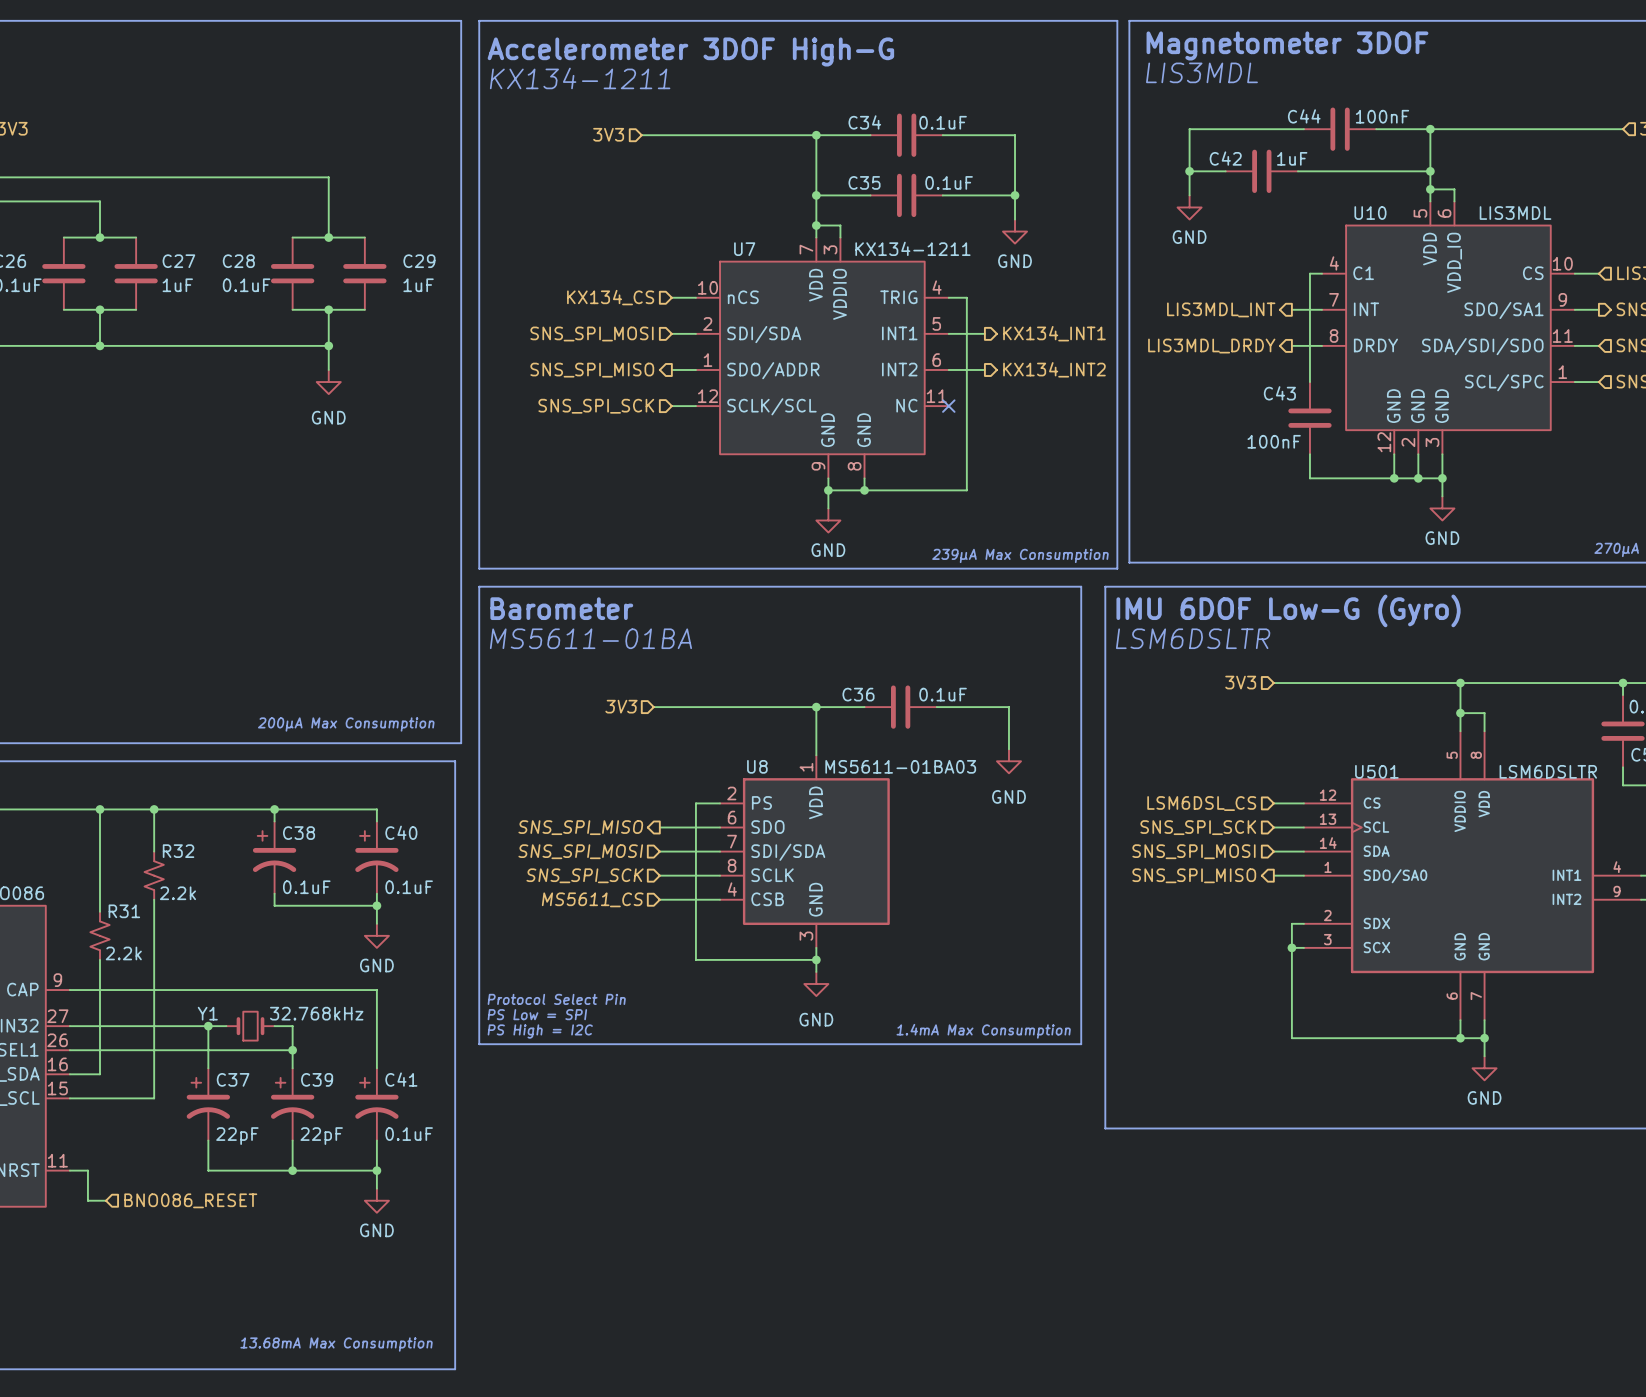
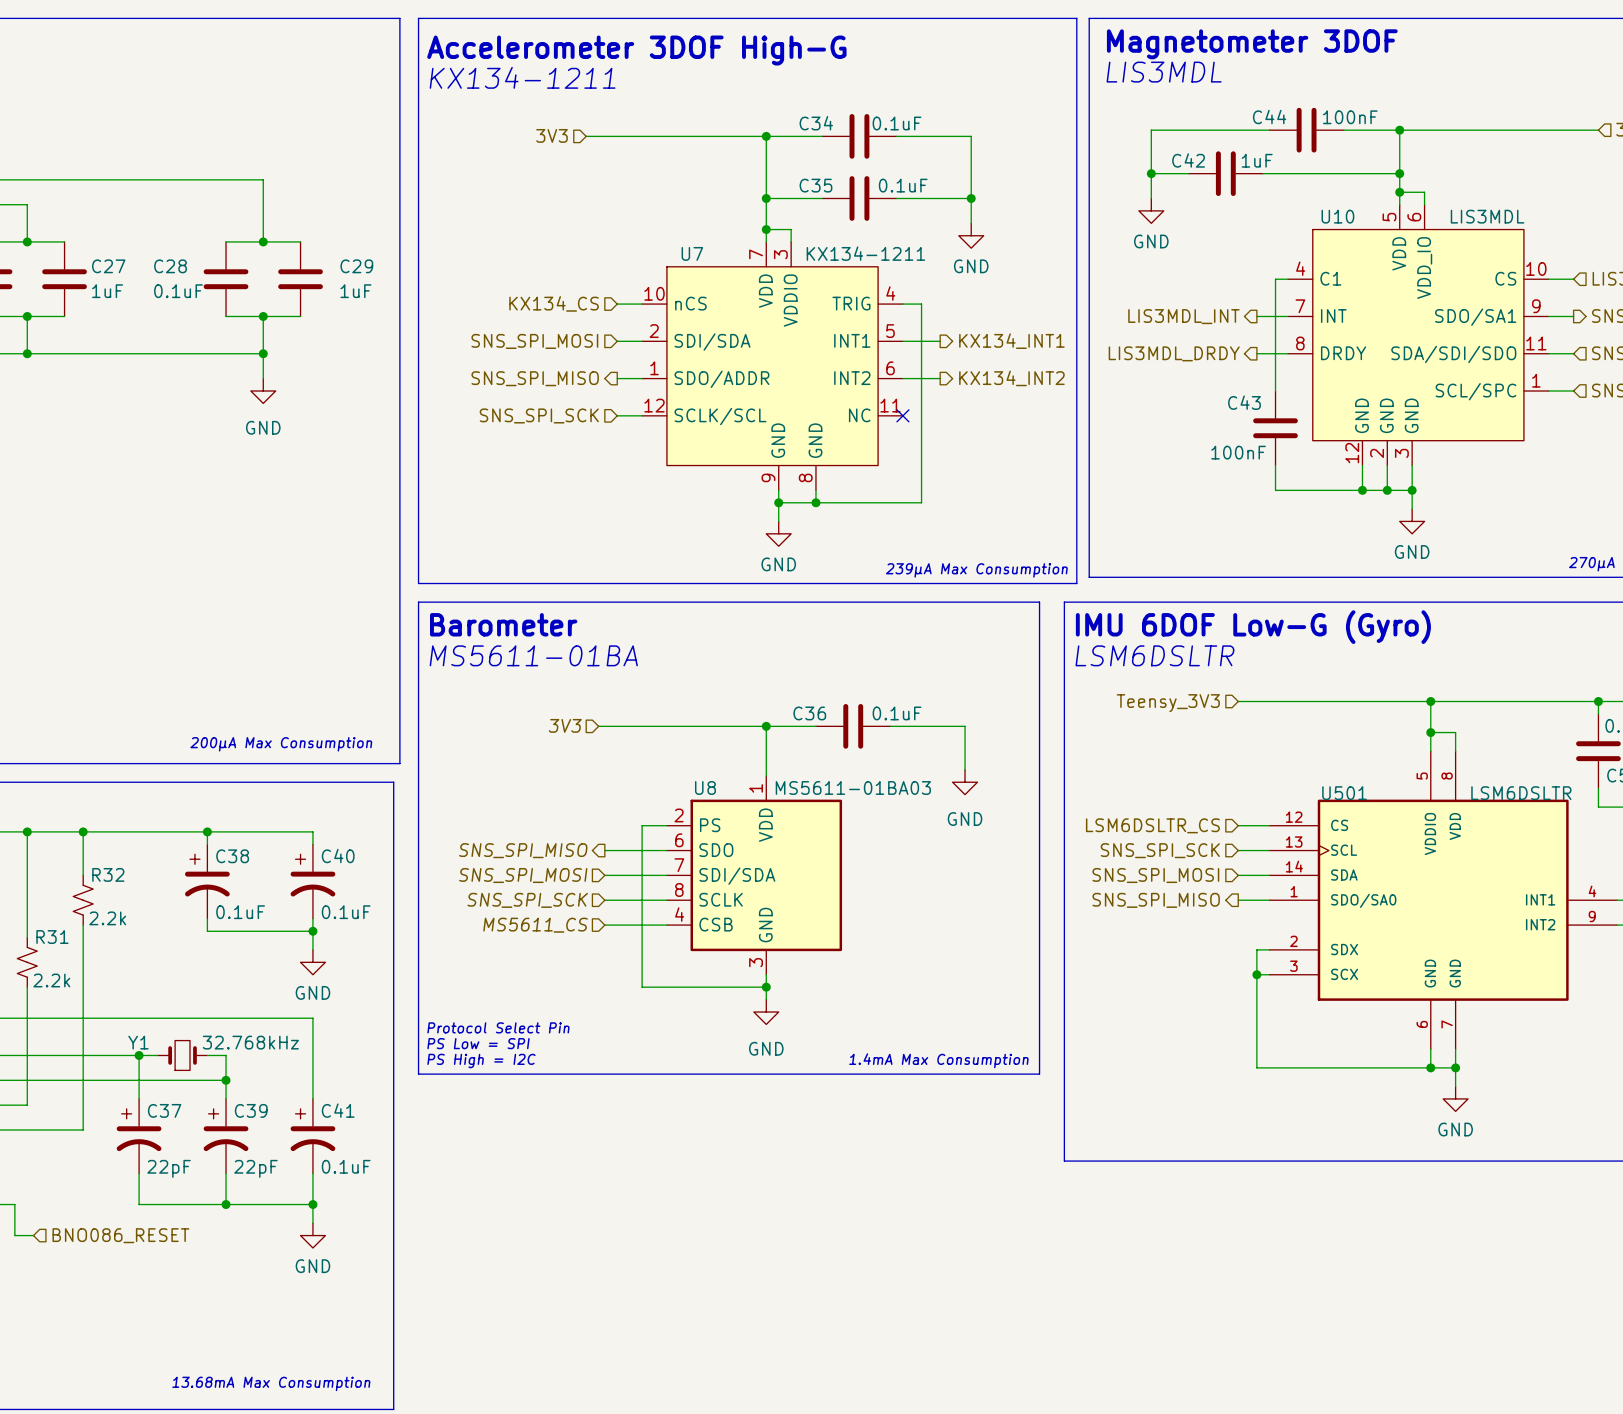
hierarchical label: 3V3 (1240, 682) -> Teensy_3V3 (1168, 703)
hierarchical label: LSM6DSL_CS (1201, 803) -> LSM6DSLTR_CS (1152, 825)

